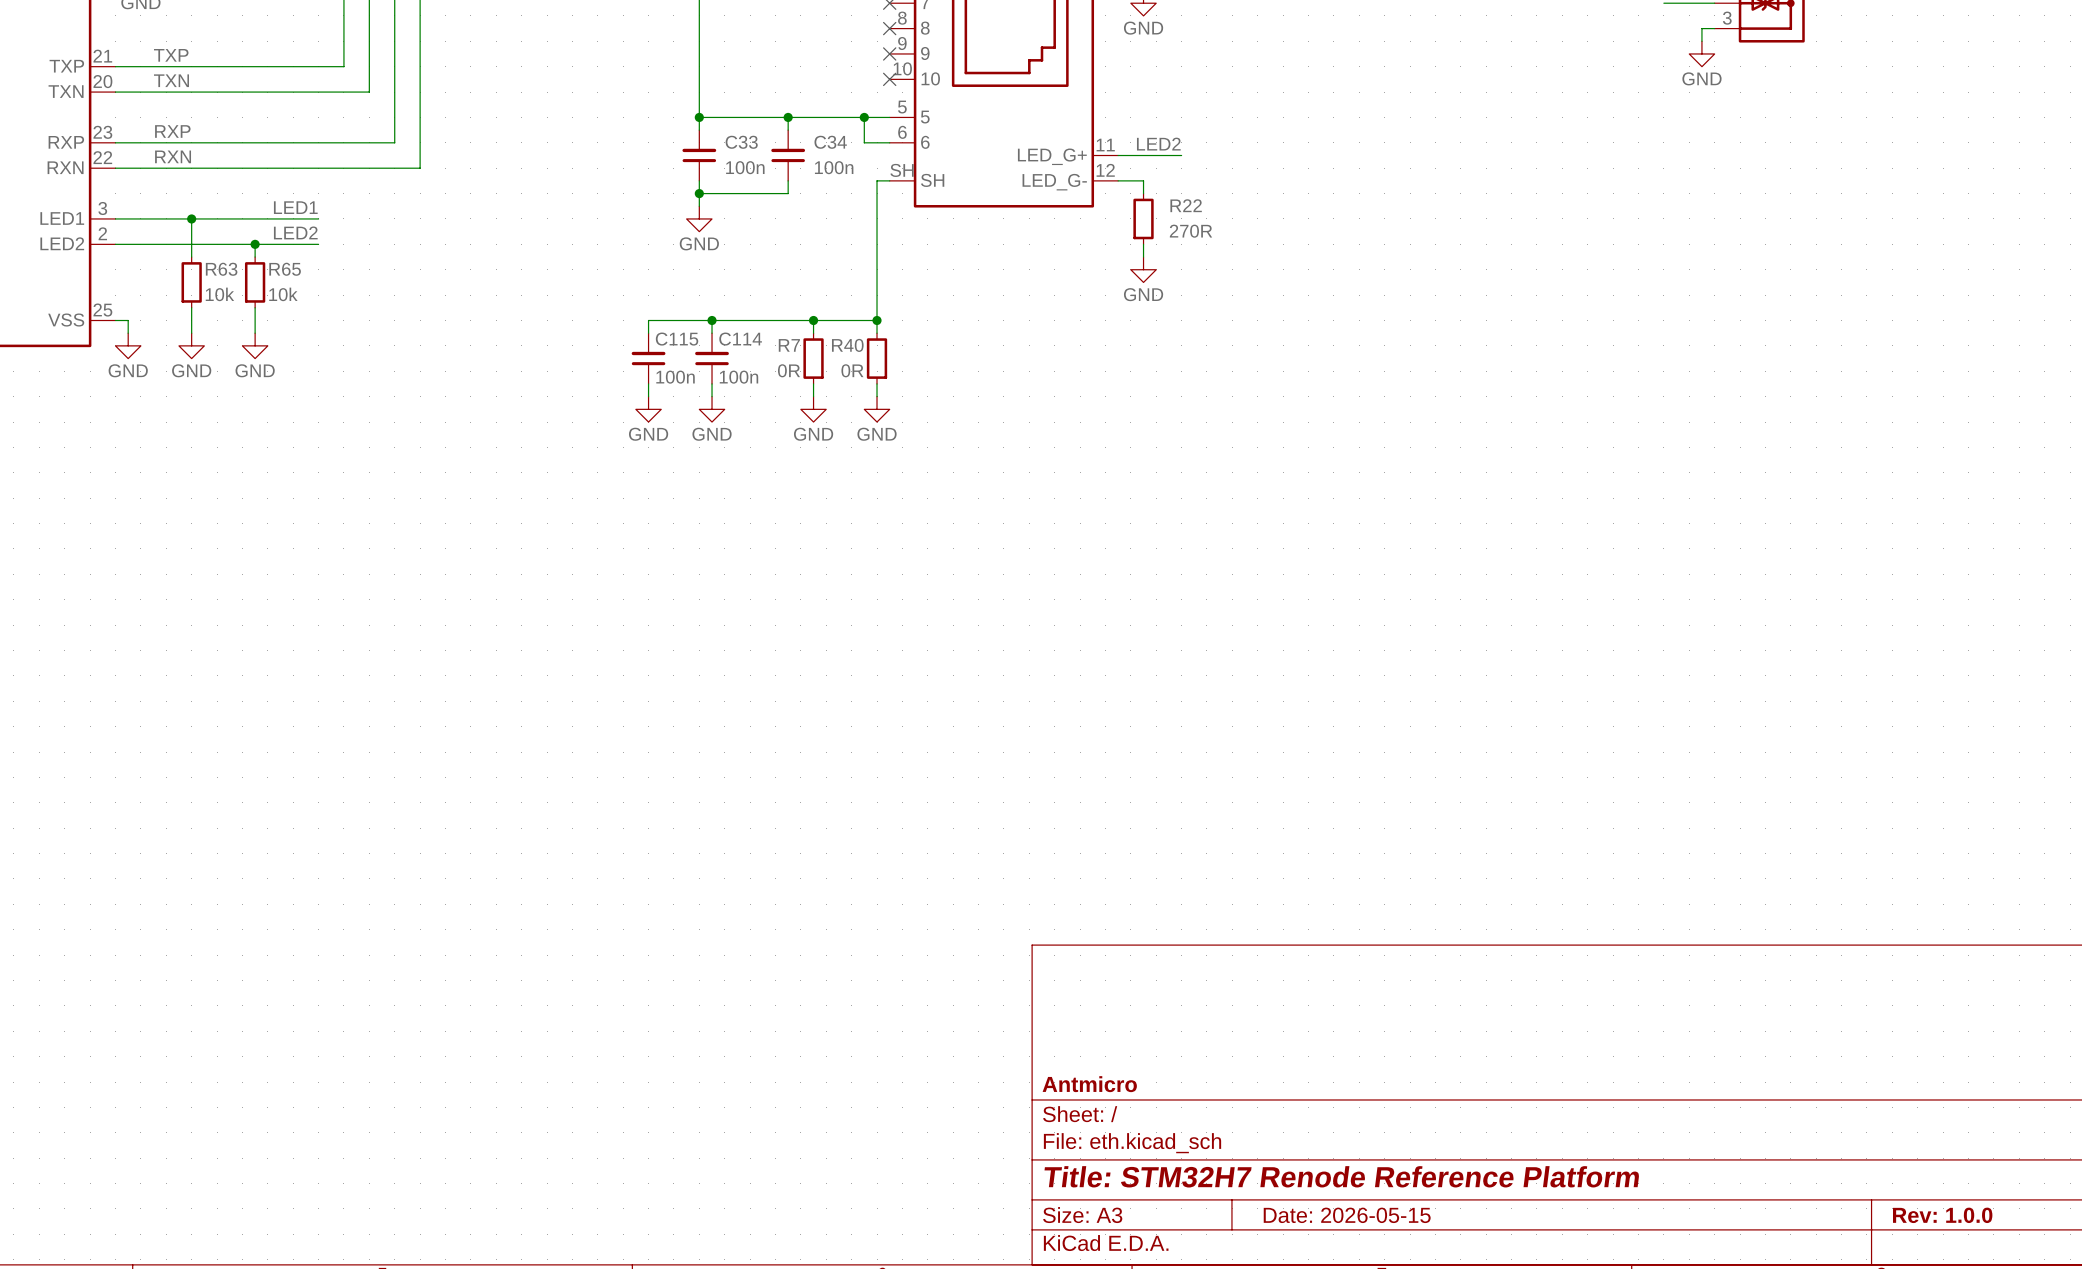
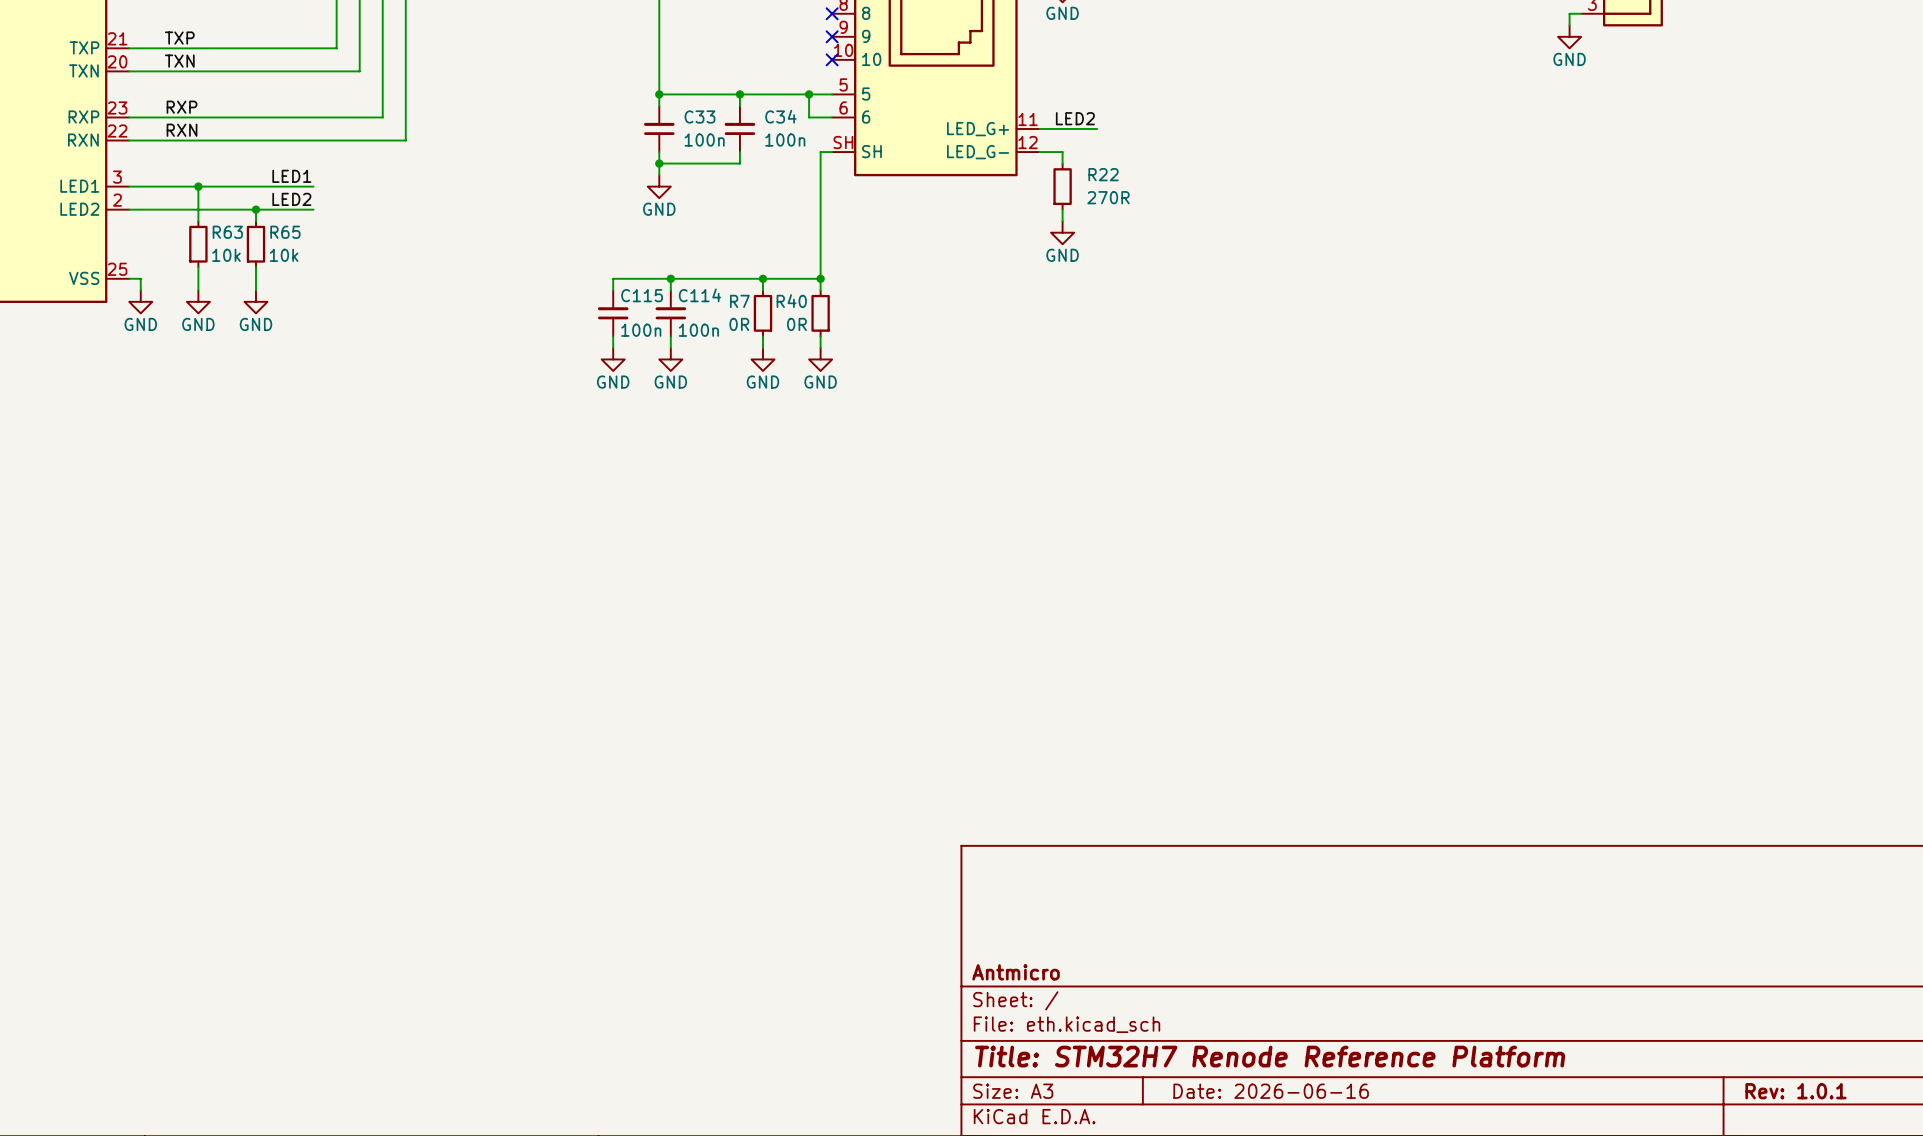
title block: Date: 2026-05-15 (1347, 1215) -> Date: 2026-06-16 (1271, 1091)
title block: Rev: 1.0.0 (1942, 1215) -> Rev: 1.0.1 (1795, 1091)

